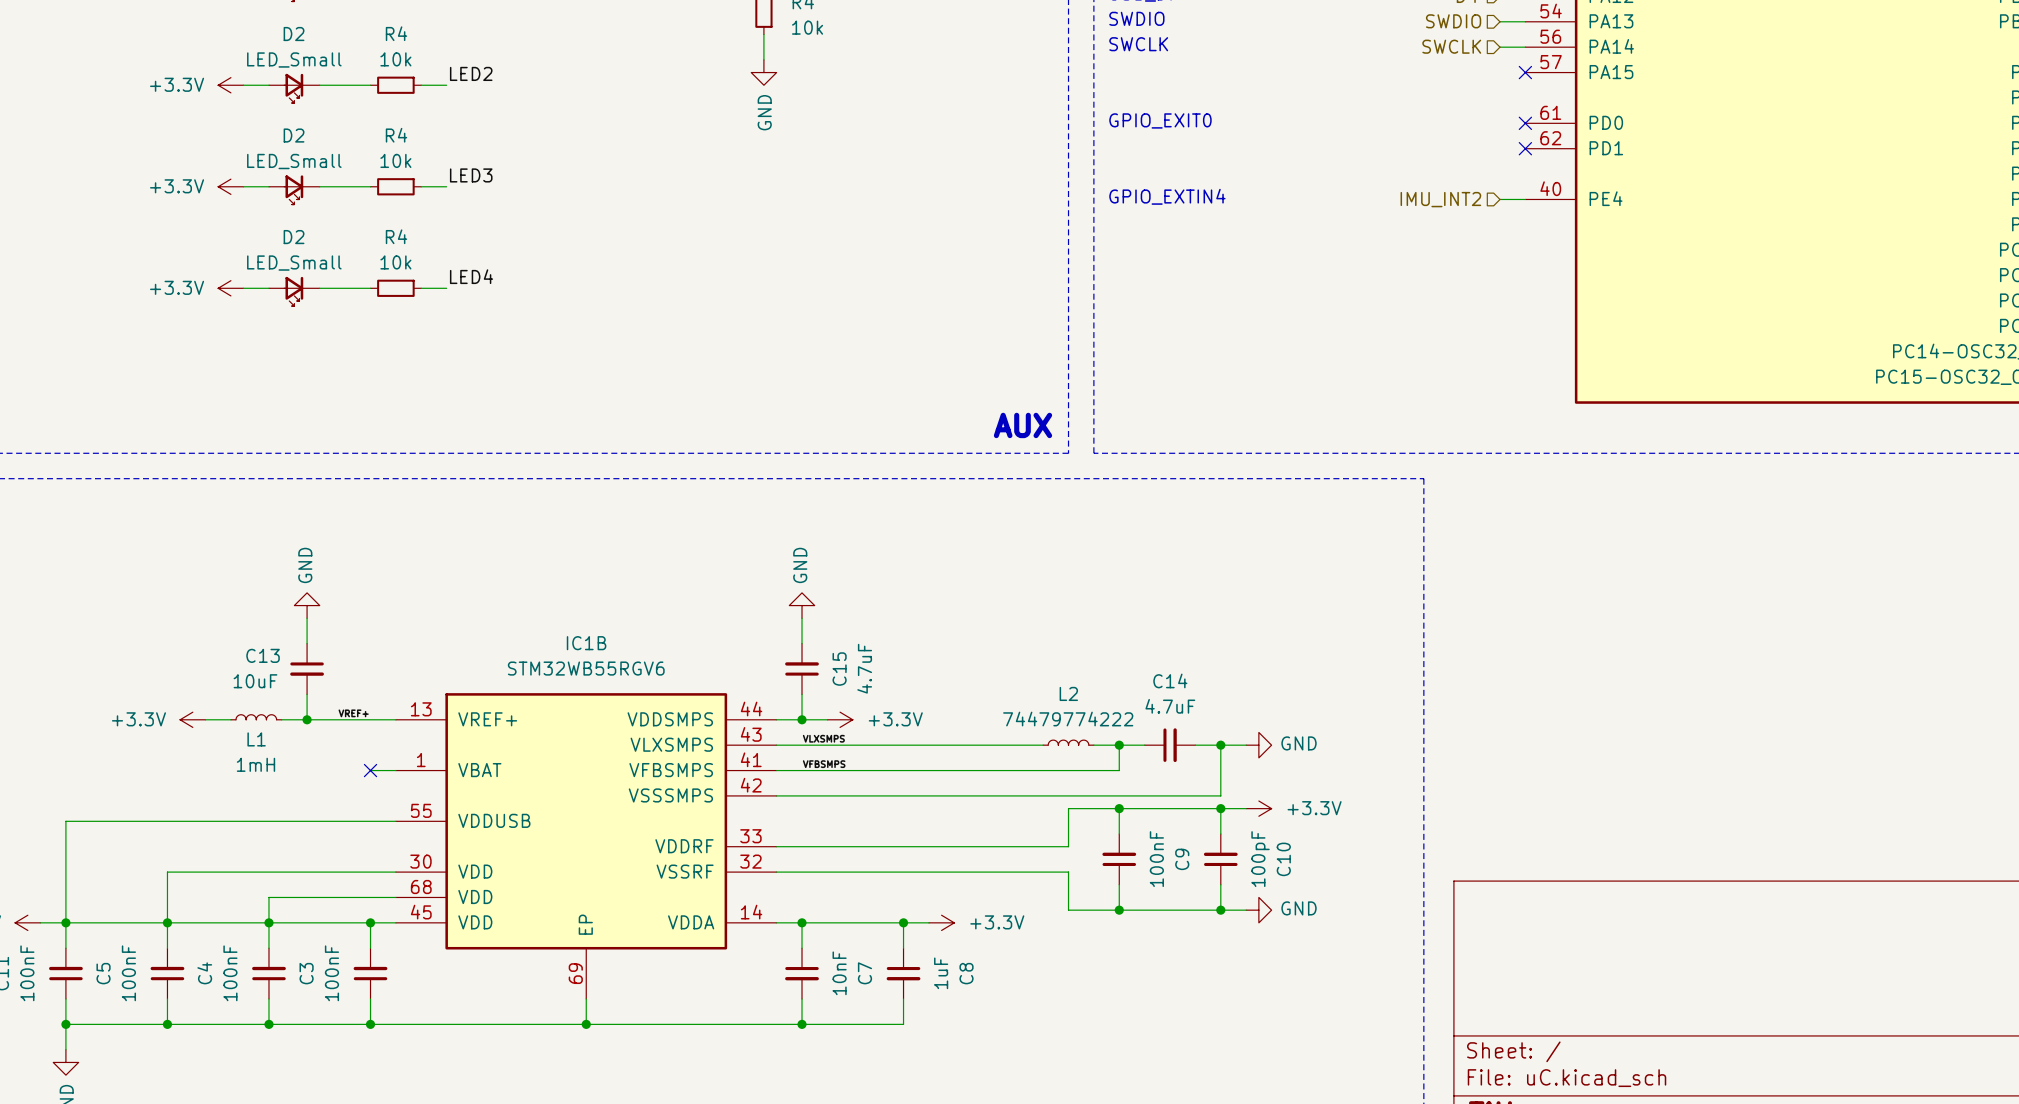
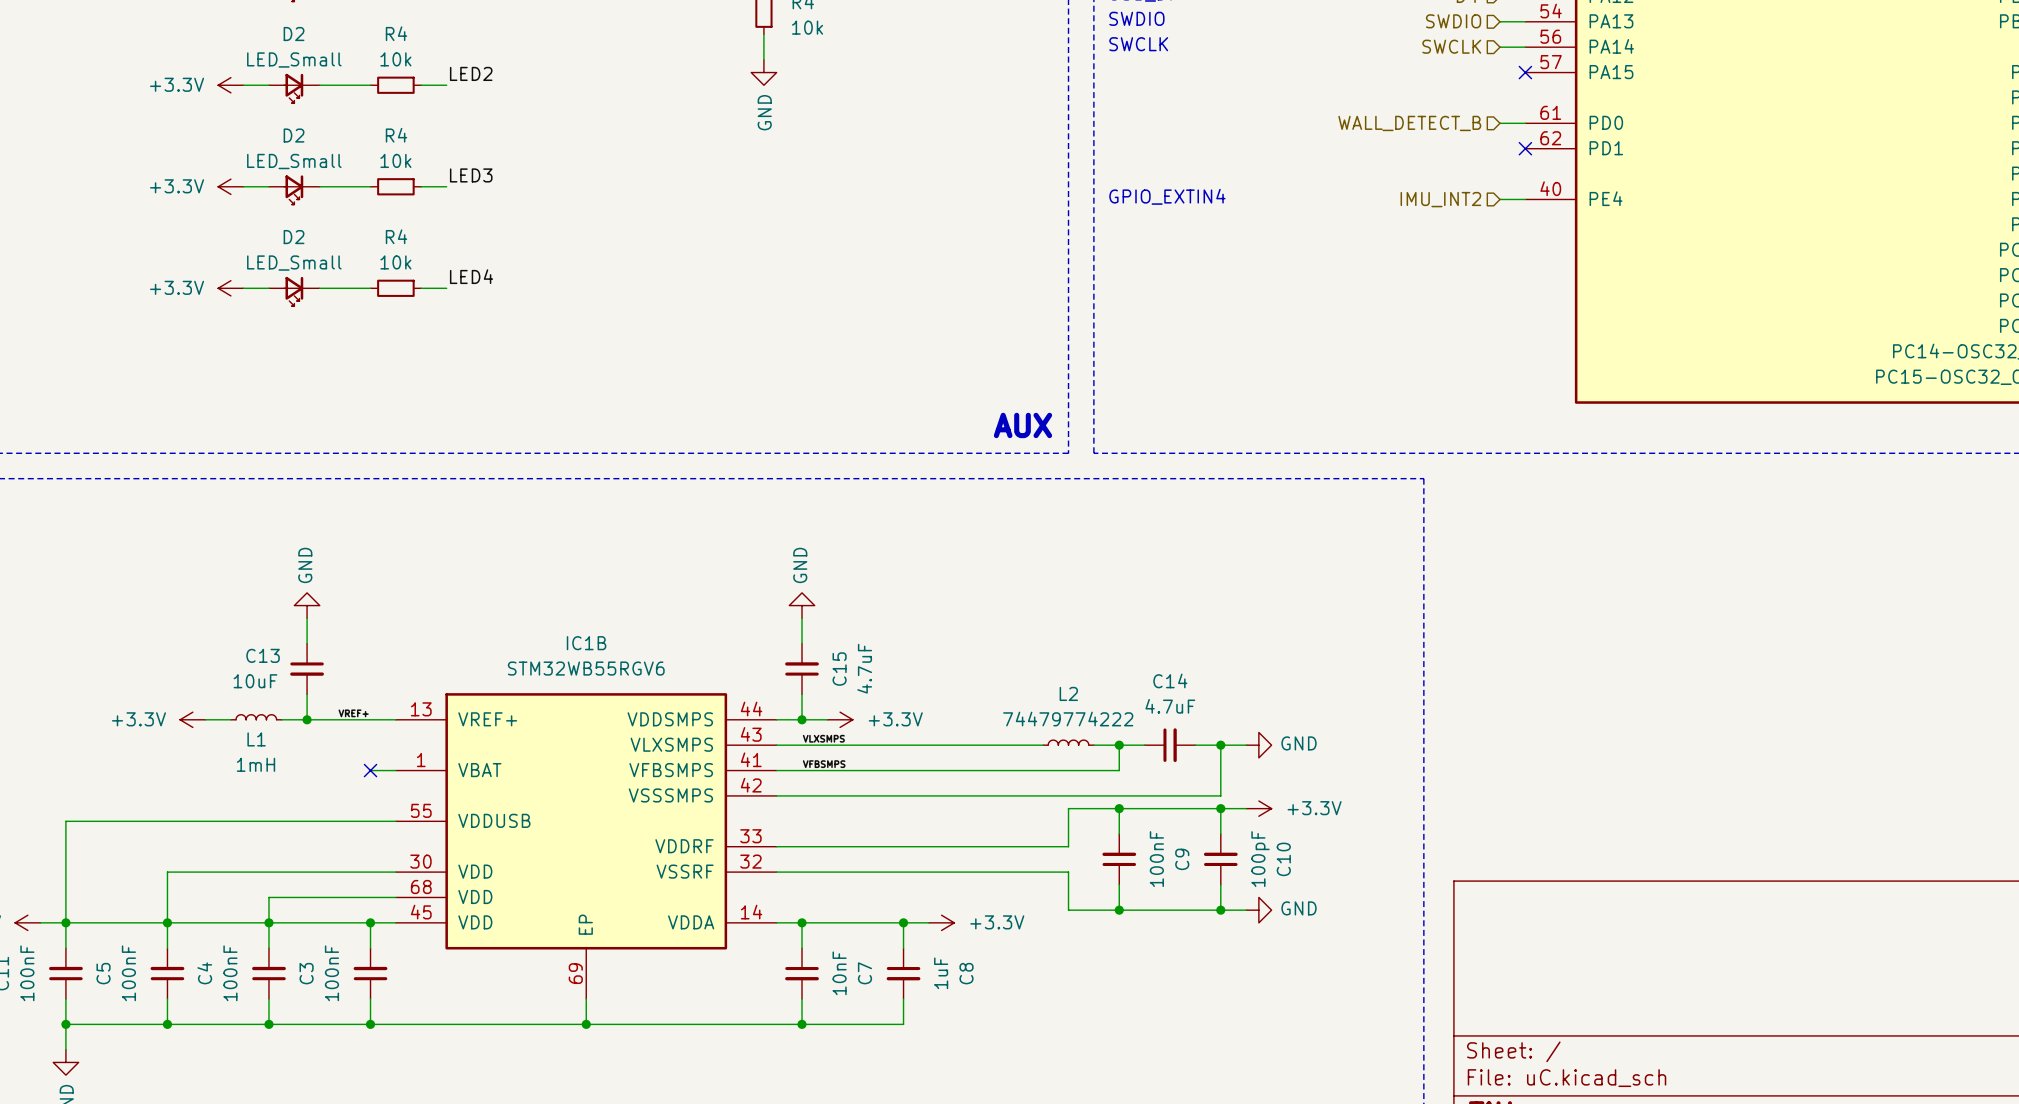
text: GPIO_EXIT0 (1160, 120) -> none
hierarchical label: none -> WALL_DETECT_B (1409, 123)
wire: none -> (1500, 123) (1525, 123)
no-connect mark: (1525, 123) -> none

